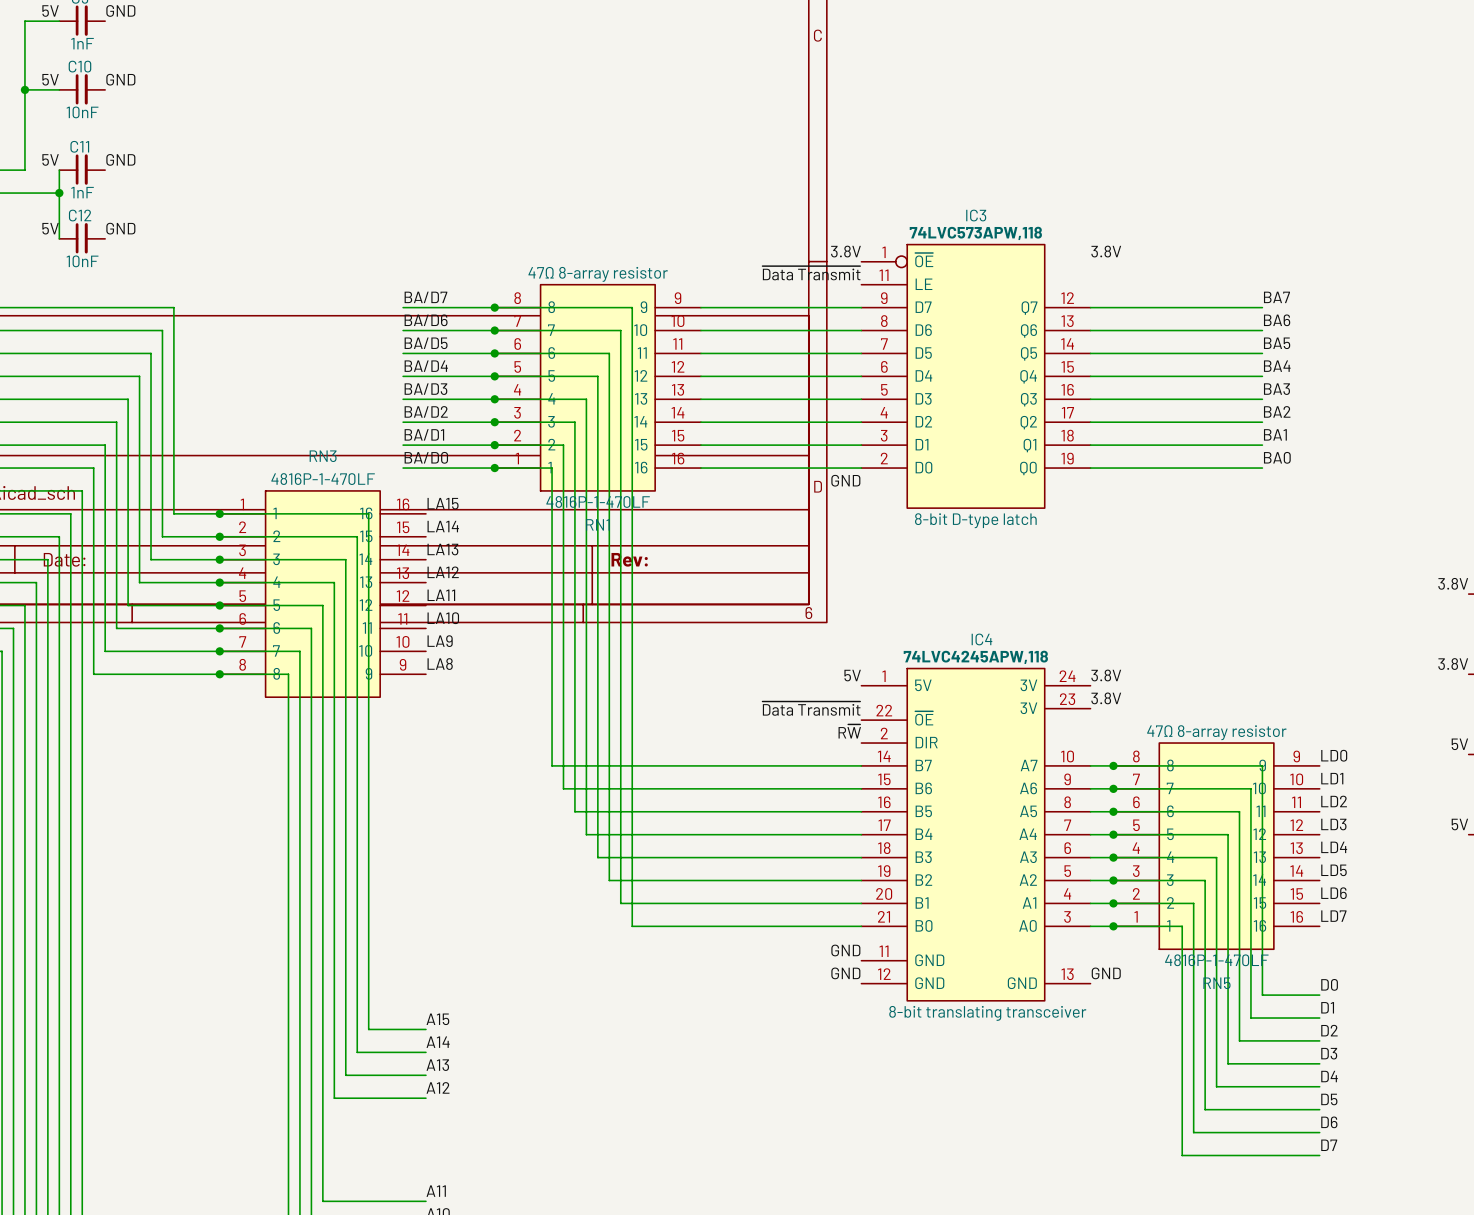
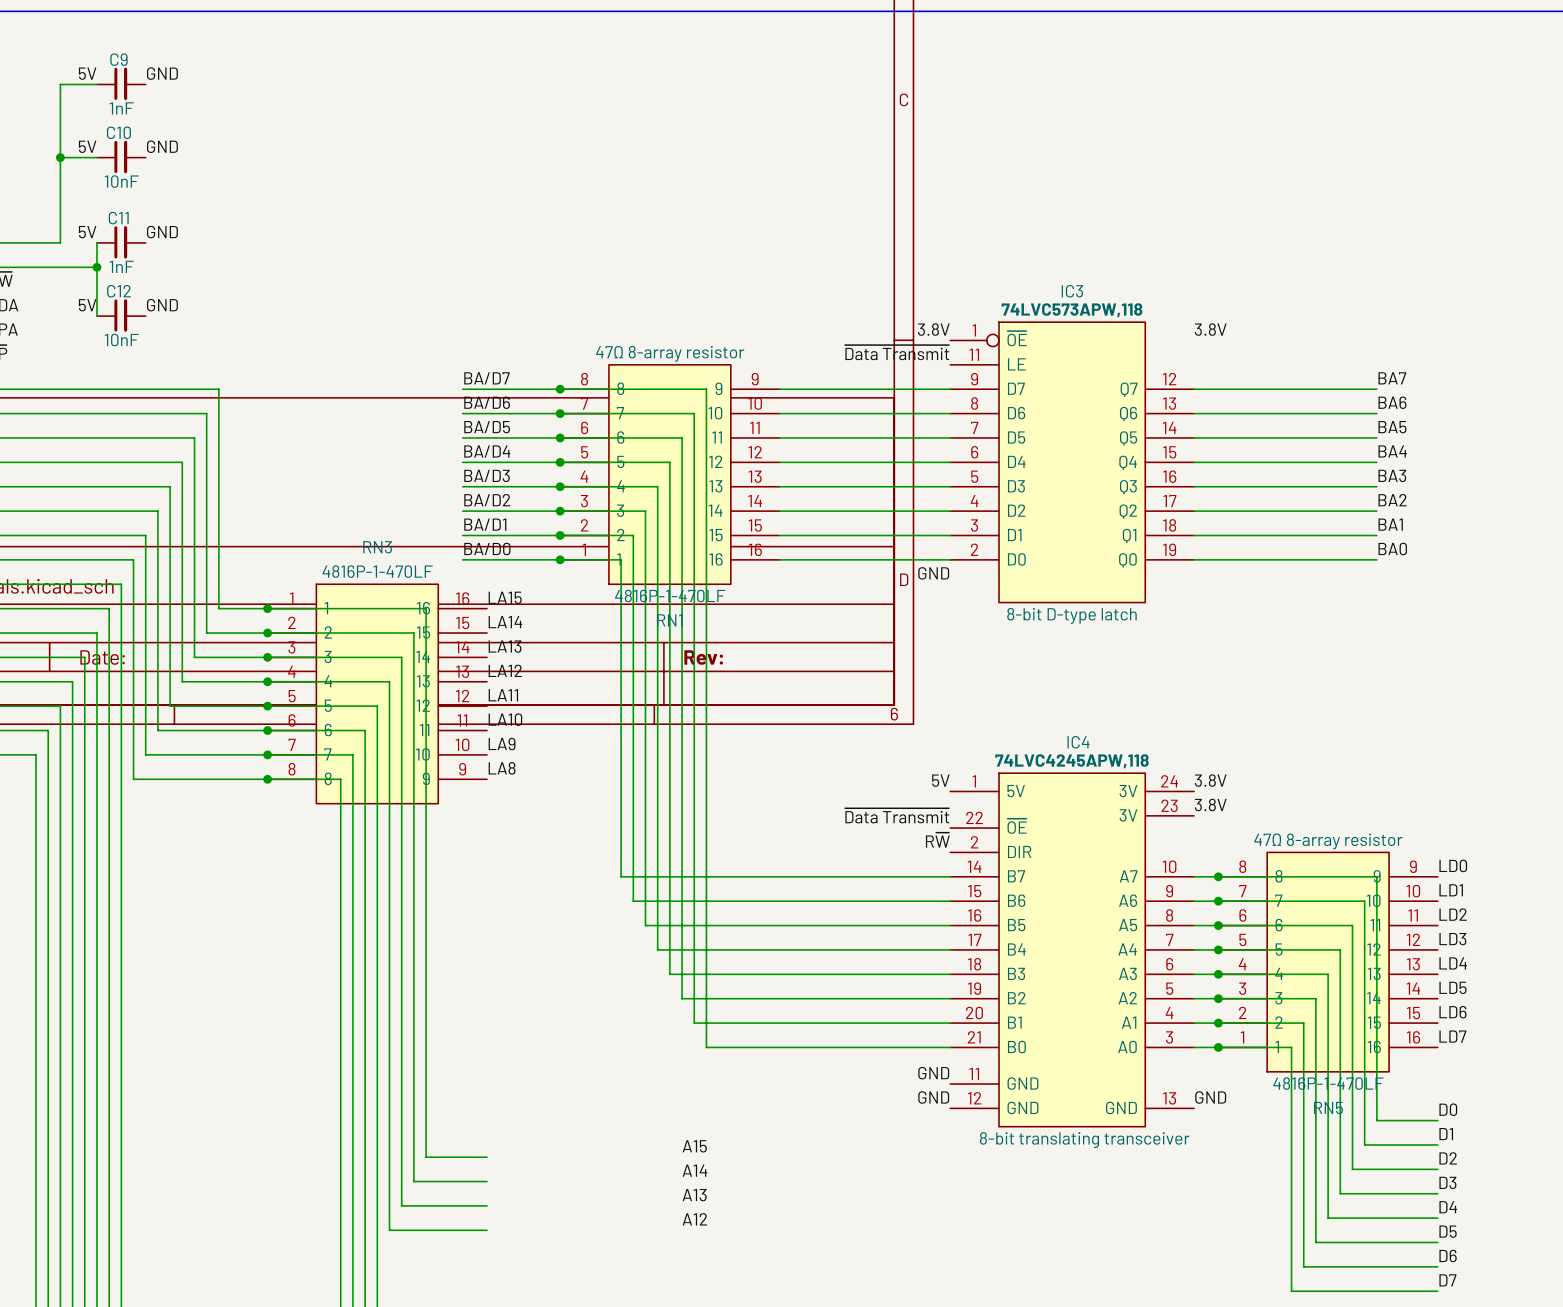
label position: A15 (437, 1019) -> A15 (694, 1146)
label position: A14 (438, 1042) -> A14 (694, 1170)
label position: A13 (437, 1065) -> A13 (694, 1195)
label position: A12 (438, 1087) -> A12 (694, 1219)

